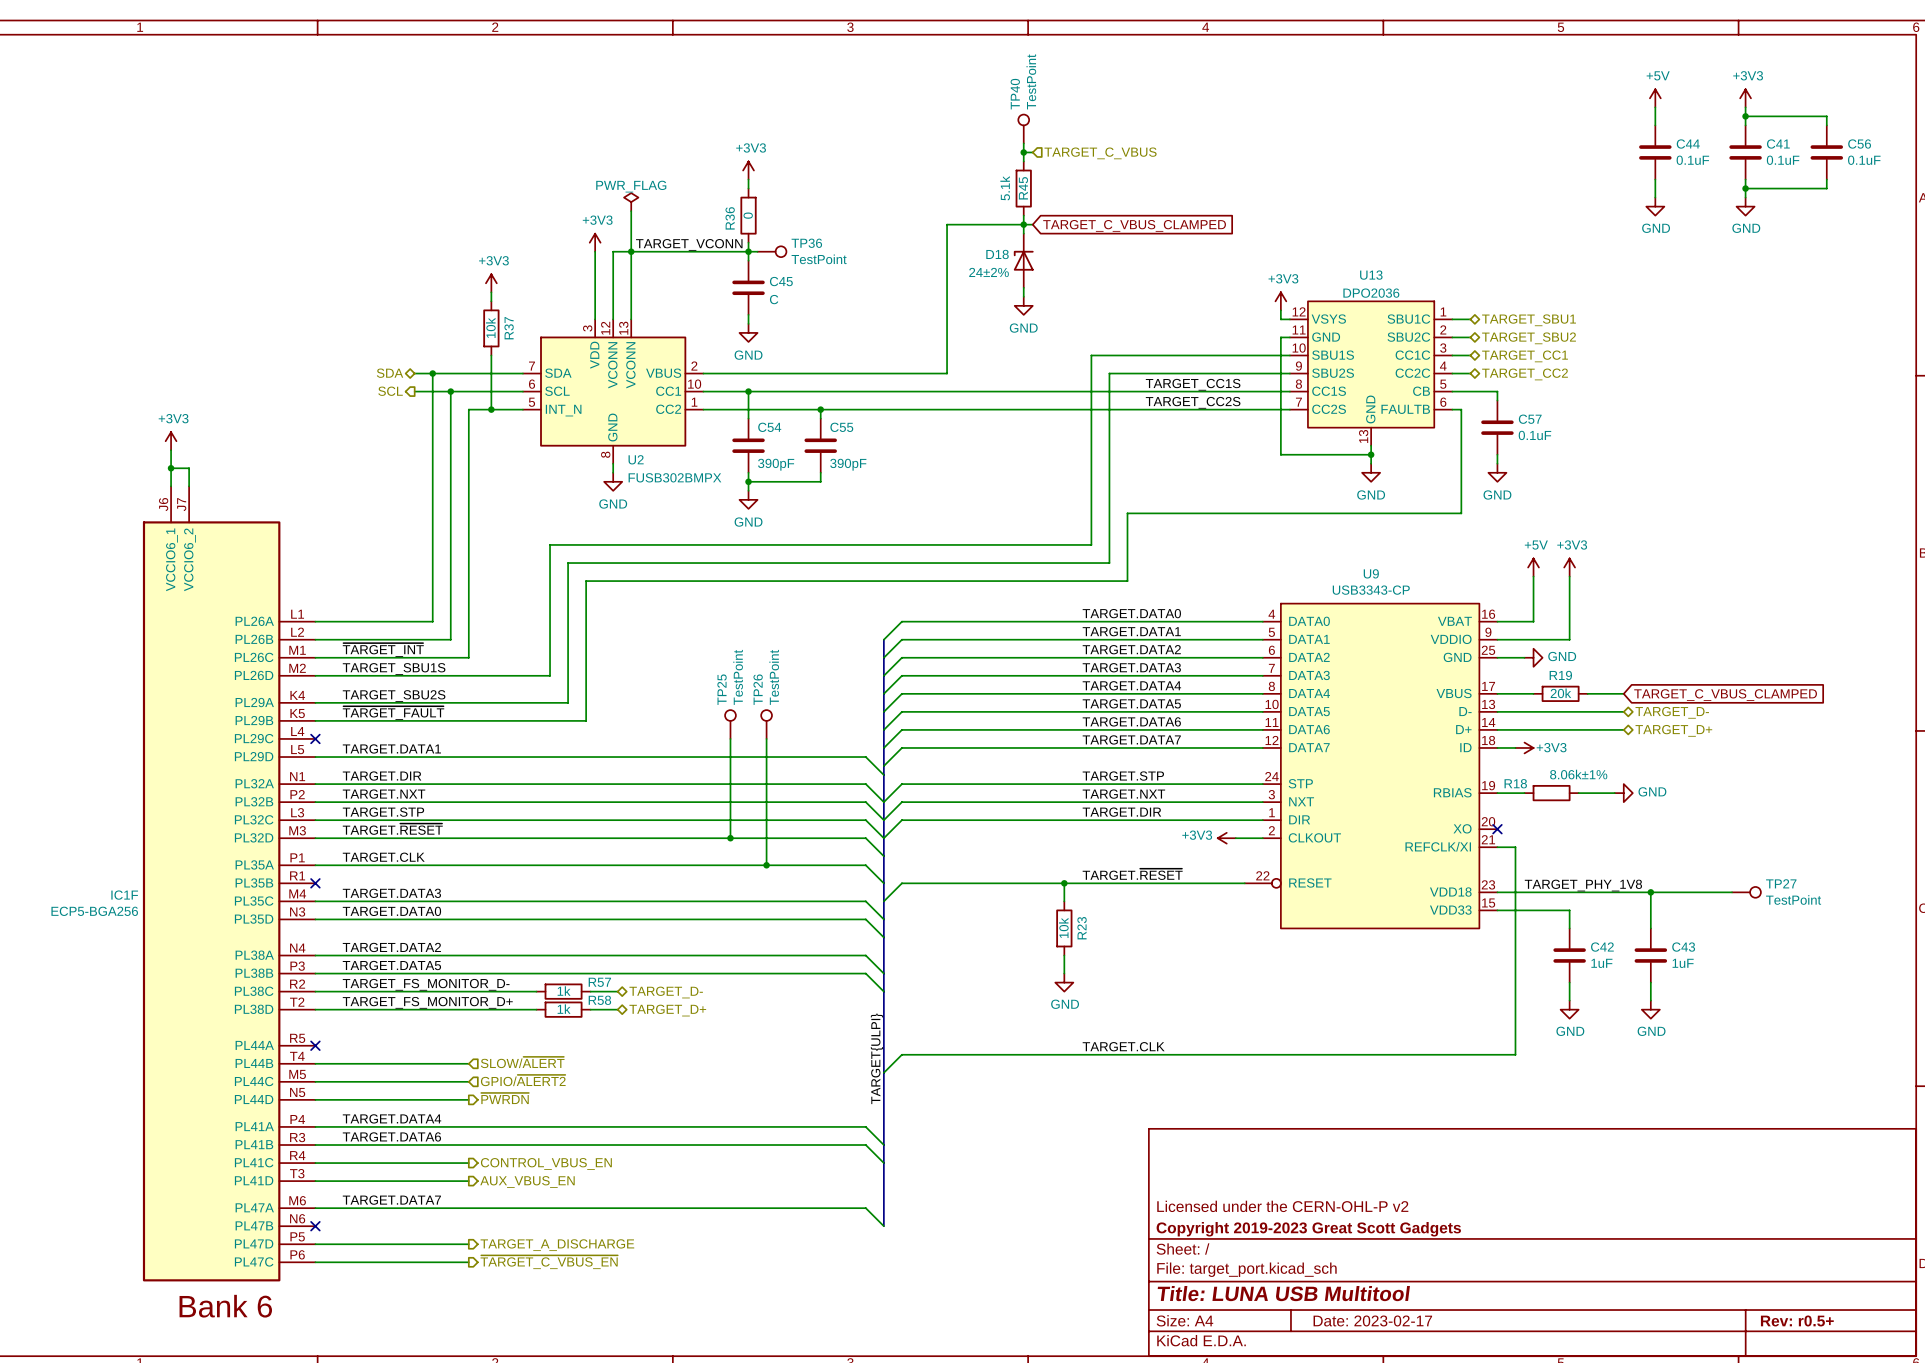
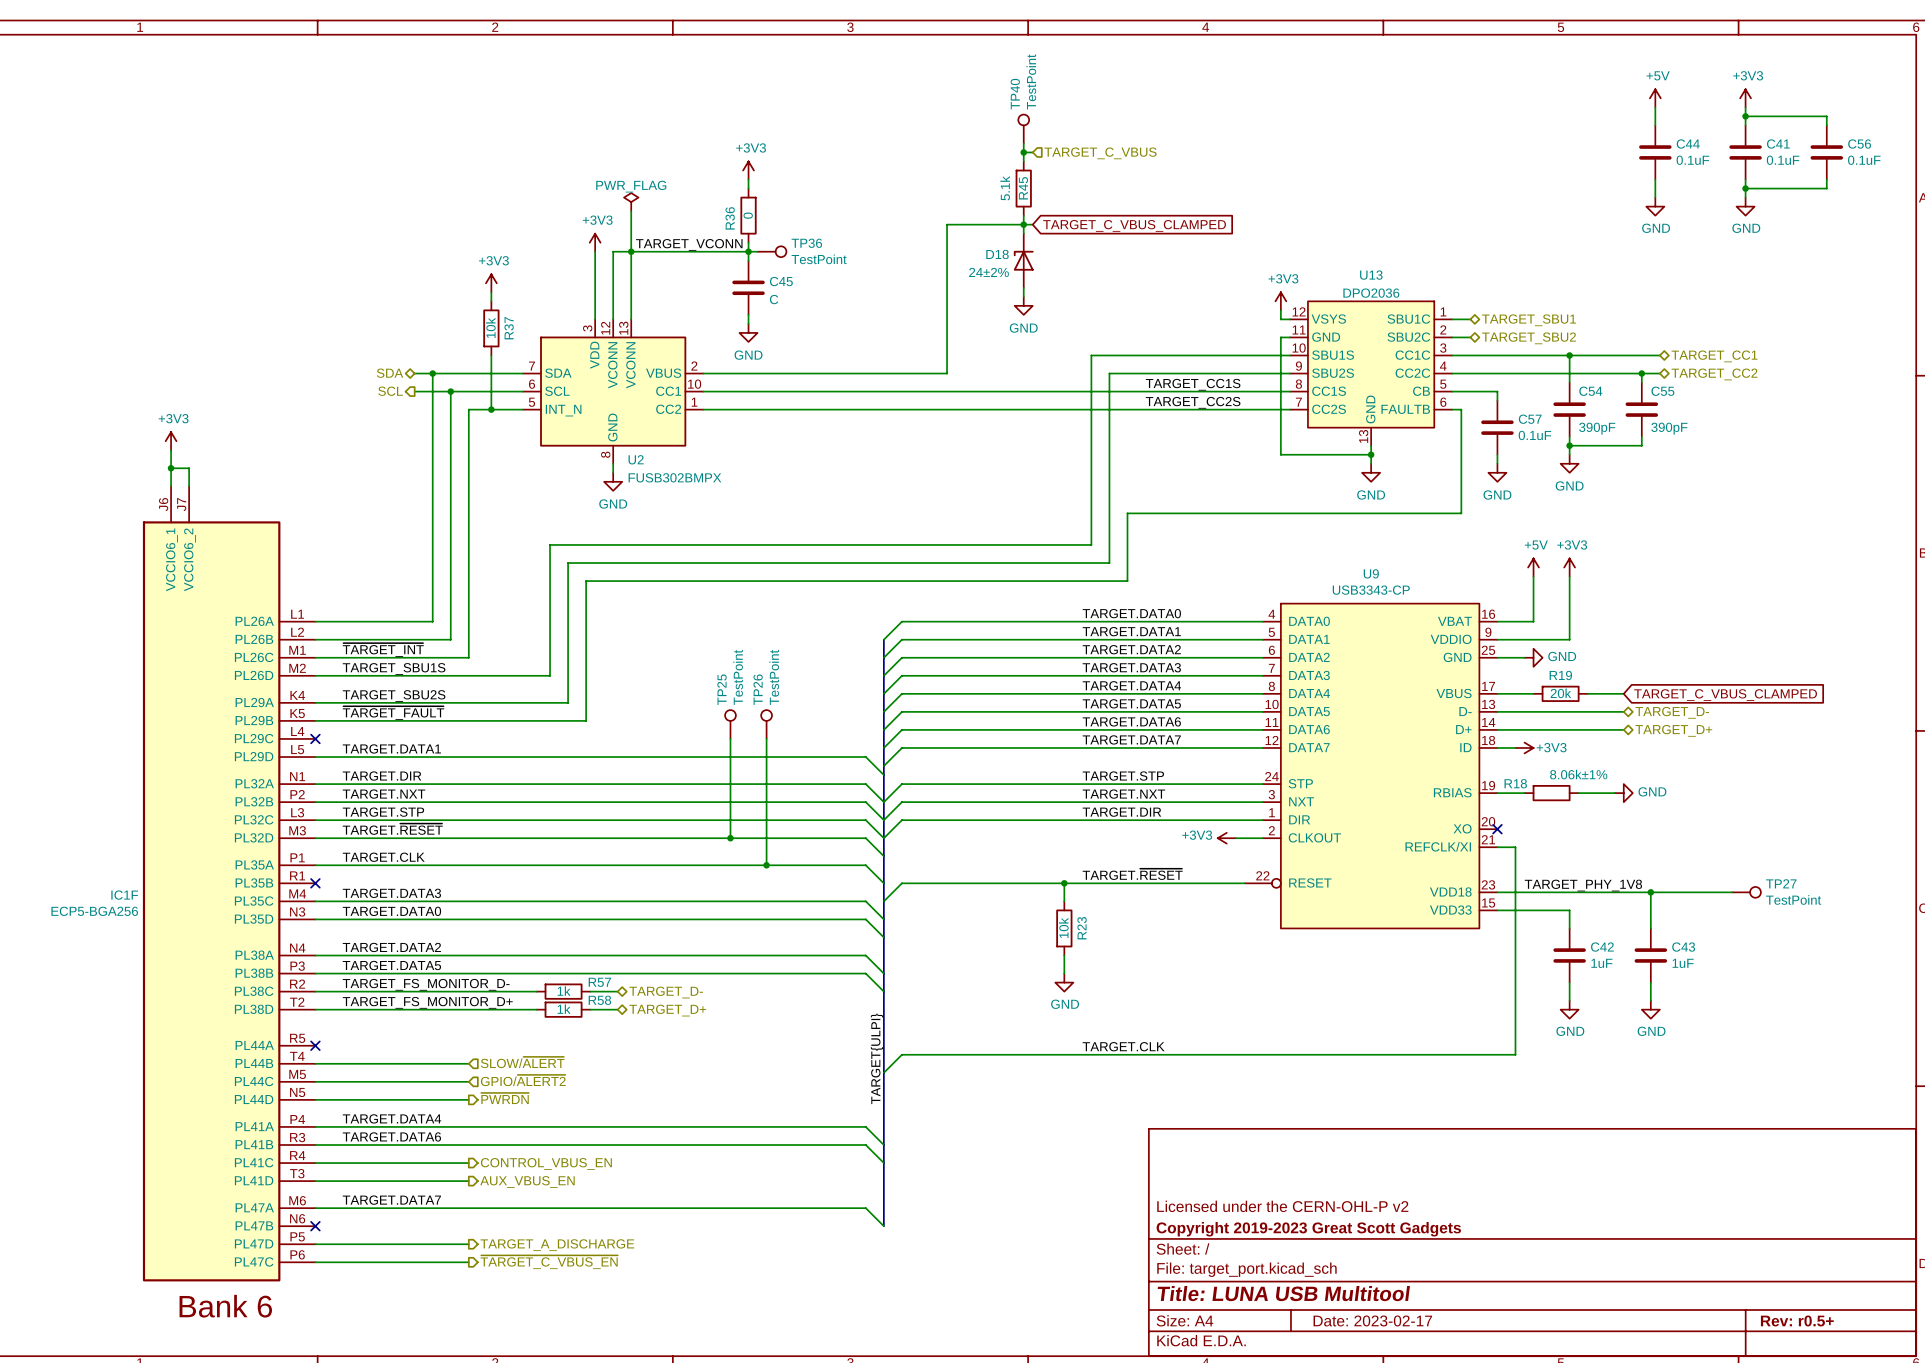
wire: none -> (1470, 355) (1659, 355)
wire: none -> (1569, 355) (1569, 382)
junction: none -> (1569, 355)
hierarchical label: TARGET_CC1 (1525, 356) -> none
hierarchical label: none -> TARGET_CC1 (1714, 356)
wire: none -> (1470, 373) (1659, 373)
wire: none -> (1641, 373) (1641, 382)
junction: none -> (1641, 373)
hierarchical label: TARGET_CC2 (1525, 374) -> none
hierarchical label: none -> TARGET_CC2 (1714, 374)
wire: (748, 391) (748, 418) -> none
junction: (748, 391) -> none
wire: (820, 409) (820, 418) -> none
junction: (820, 409) -> none
wire: none -> (1569, 436) (1569, 454)
wire: none -> (1641, 436) (1641, 445) (1569, 445)
C54 position: (748, 445) -> (1569, 409)
C55 position: (820, 445) -> (1641, 409)
junction: none -> (1569, 445)
power symbol: none -> GND (1569, 463)
wire: (748, 472) (748, 490) -> none
wire: (820, 472) (820, 481) (748, 481) -> none
junction: (748, 481) -> none
power symbol: GND (748, 499) -> none

